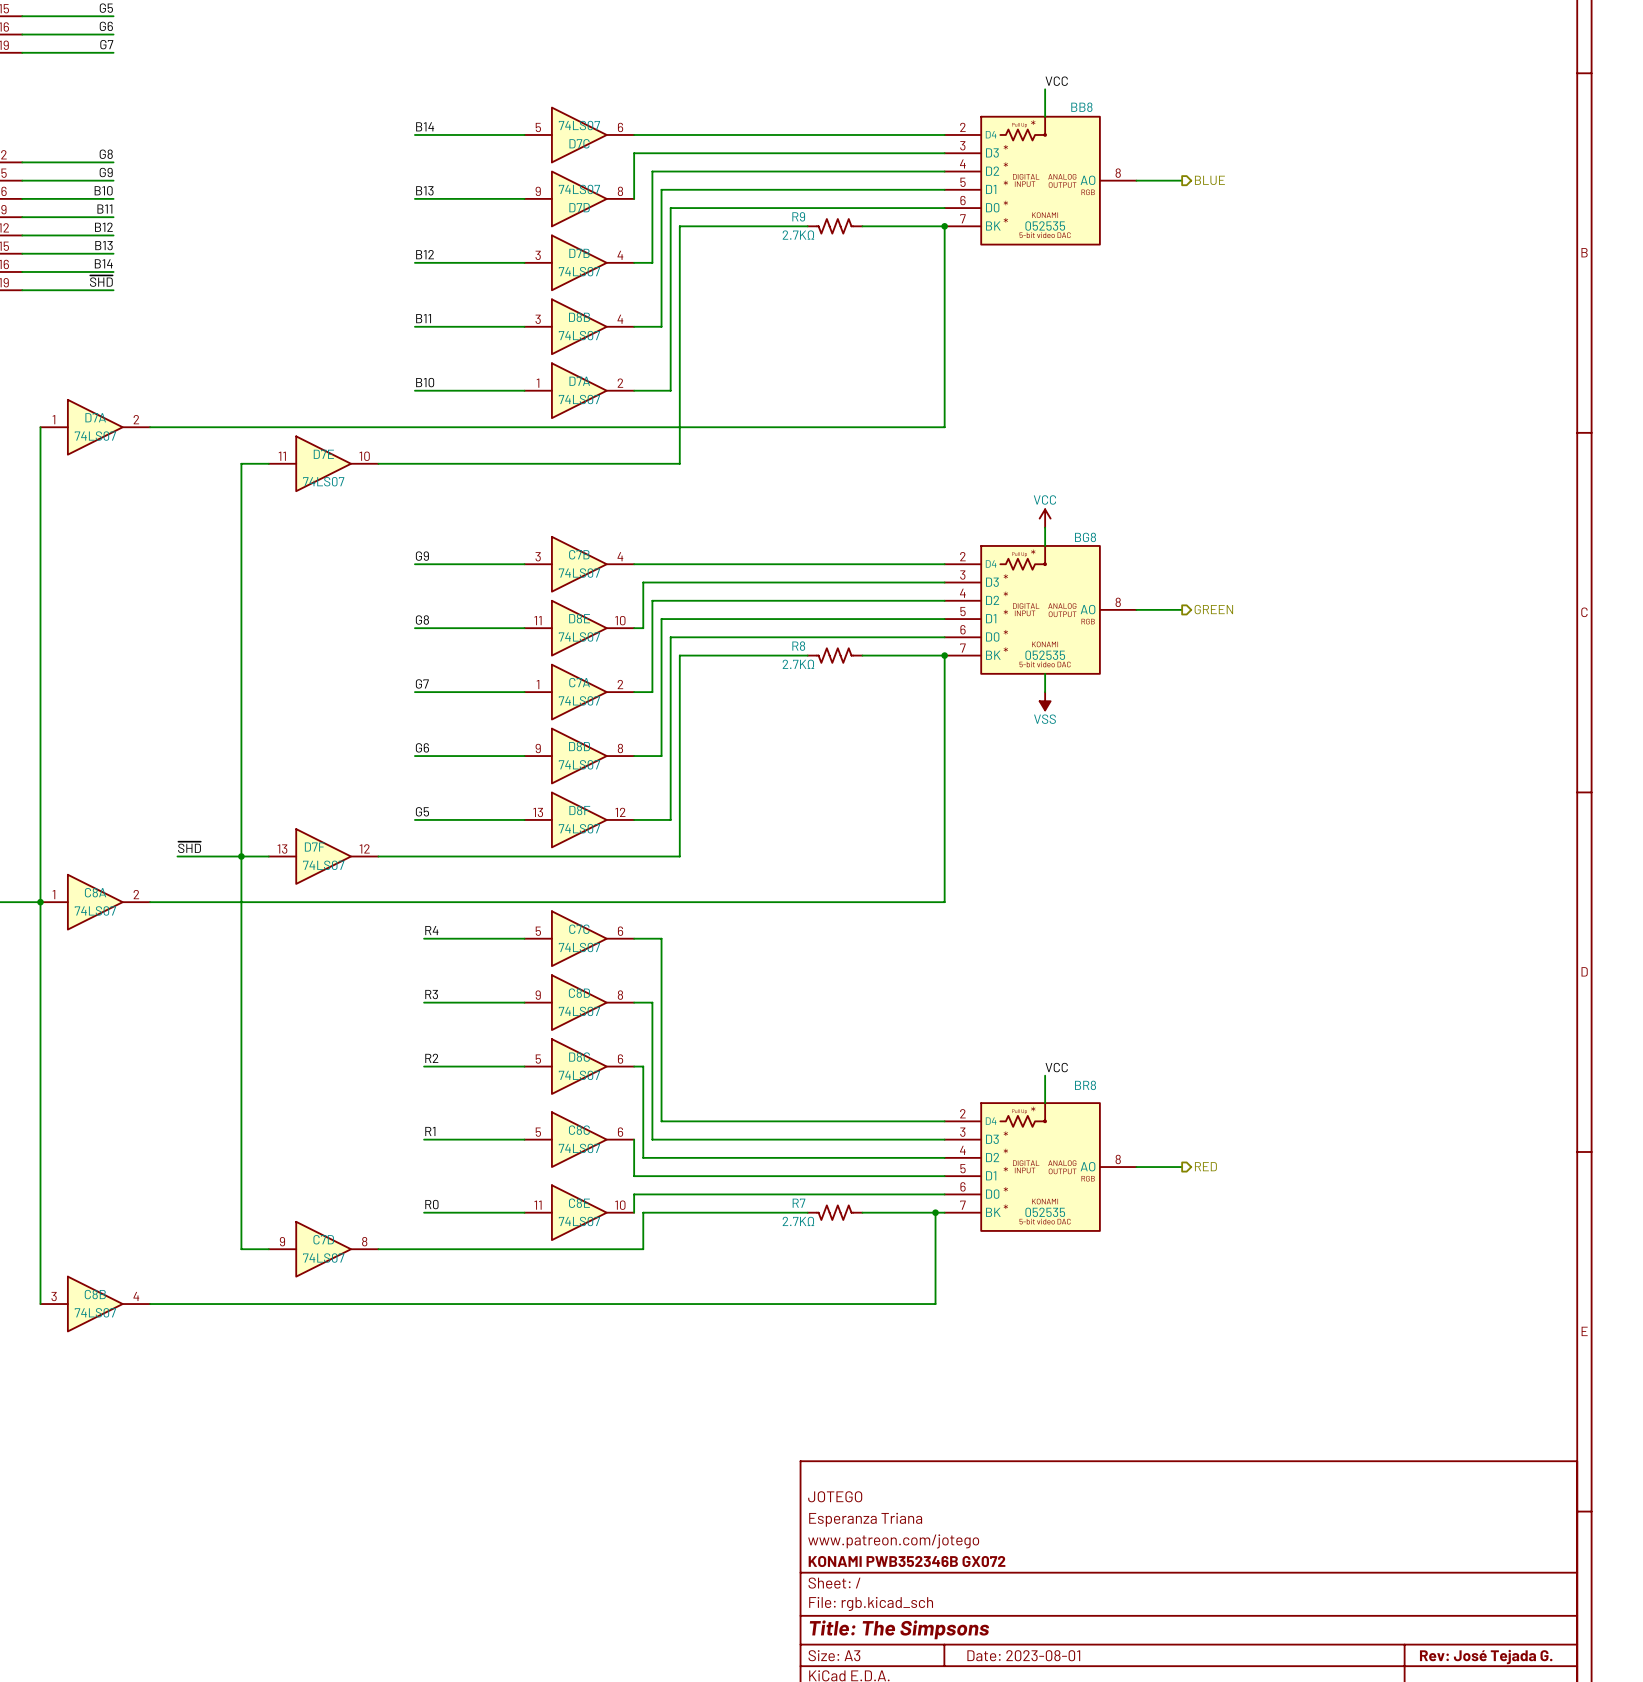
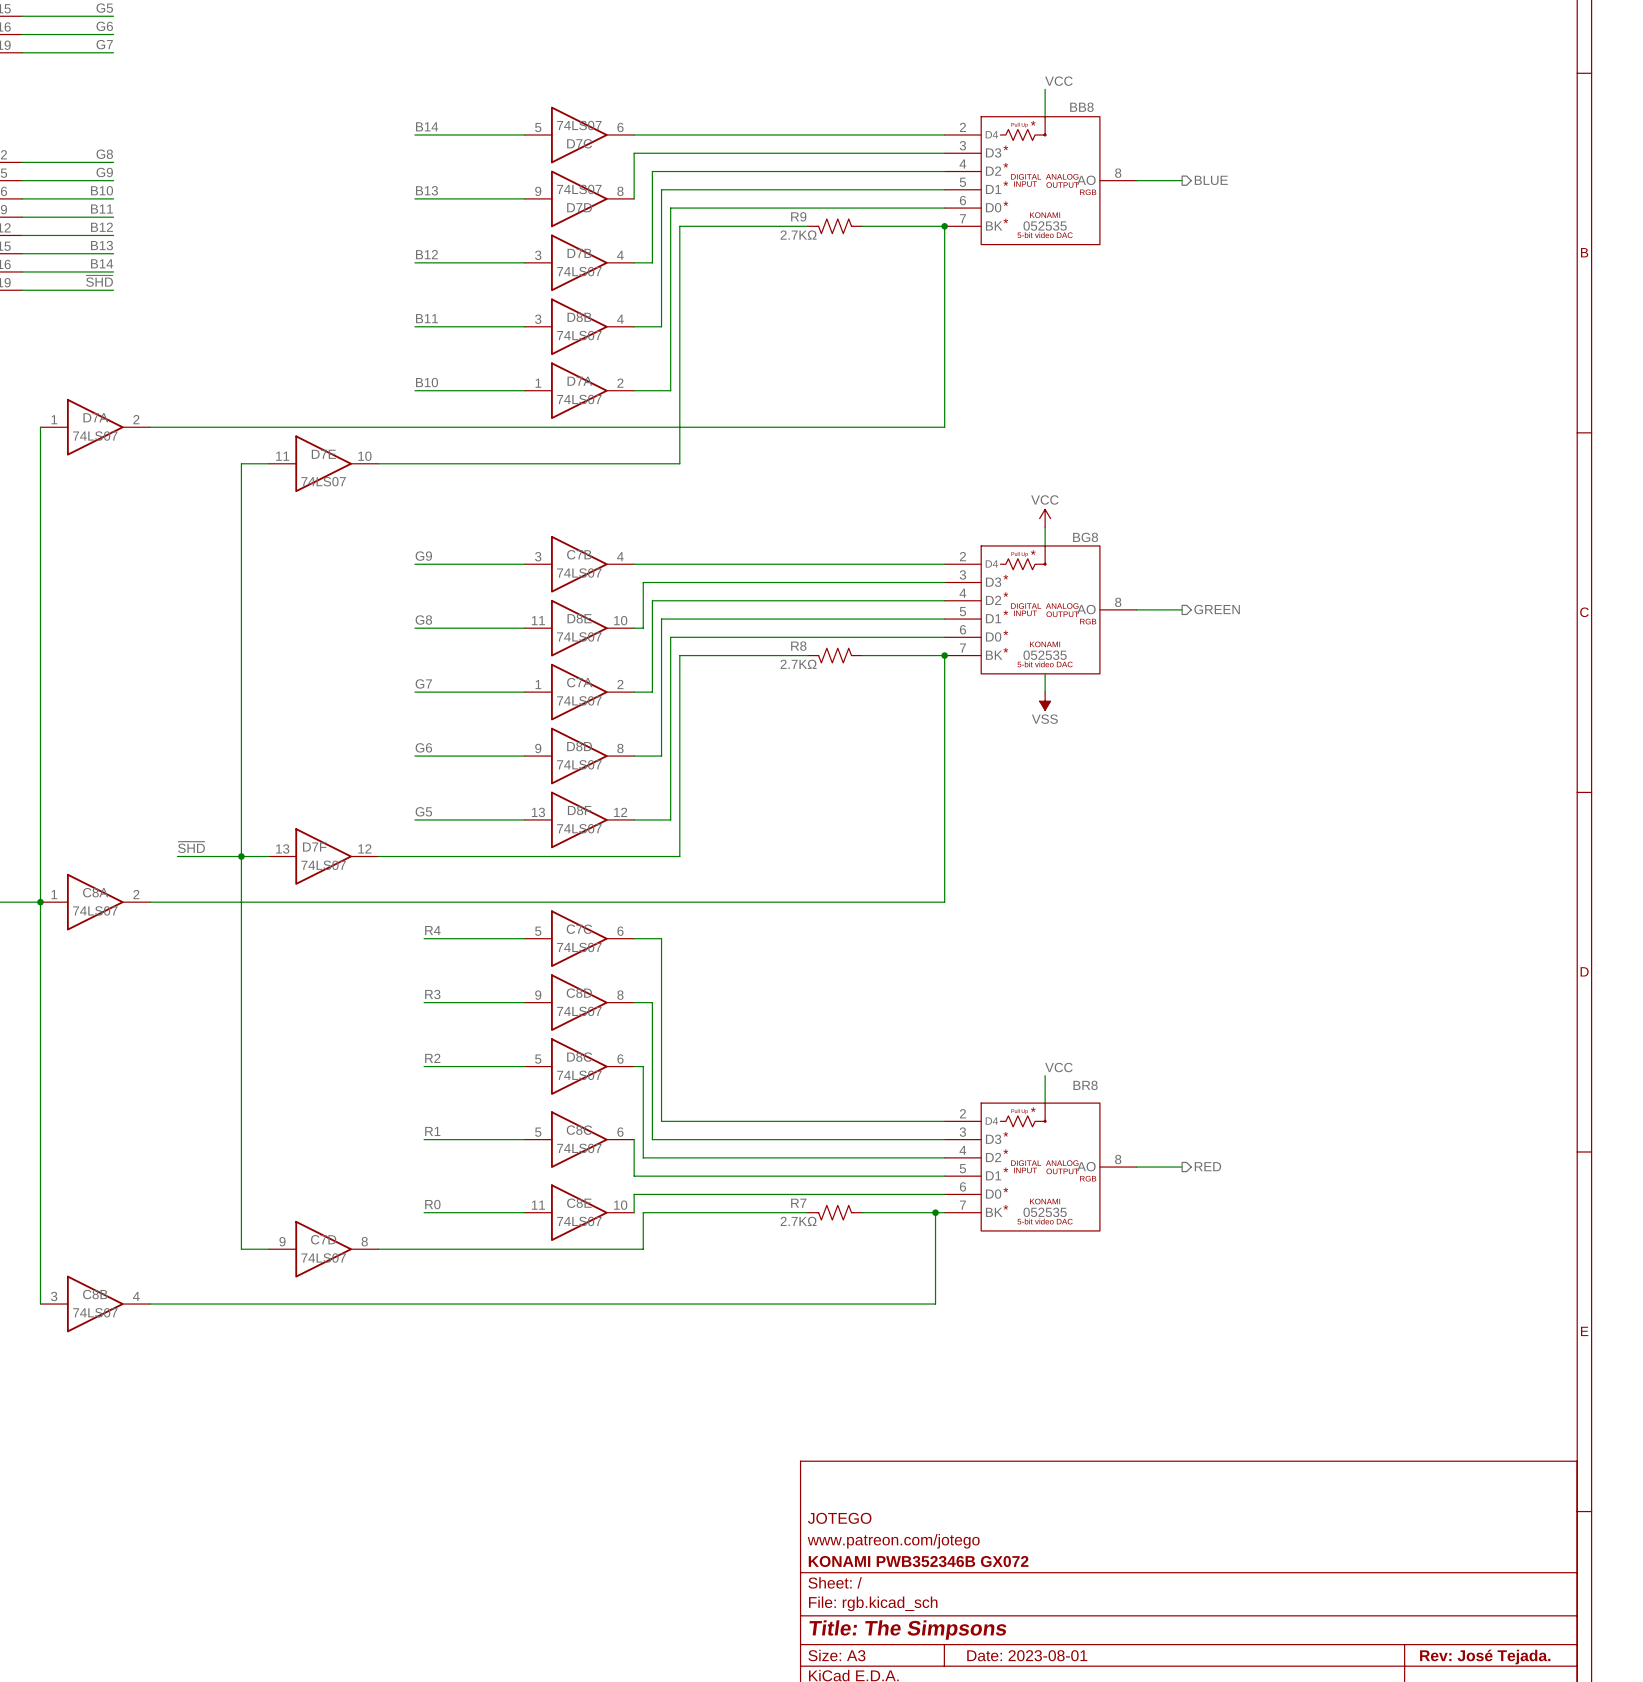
title block: JOTEGO (835, 1496) -> none
title block: Esperanza Triana (865, 1519) -> JOTEGO (839, 1518)
title block: Rev: José Tejada G. (1486, 1657) -> Rev: José Tejada. (1485, 1656)

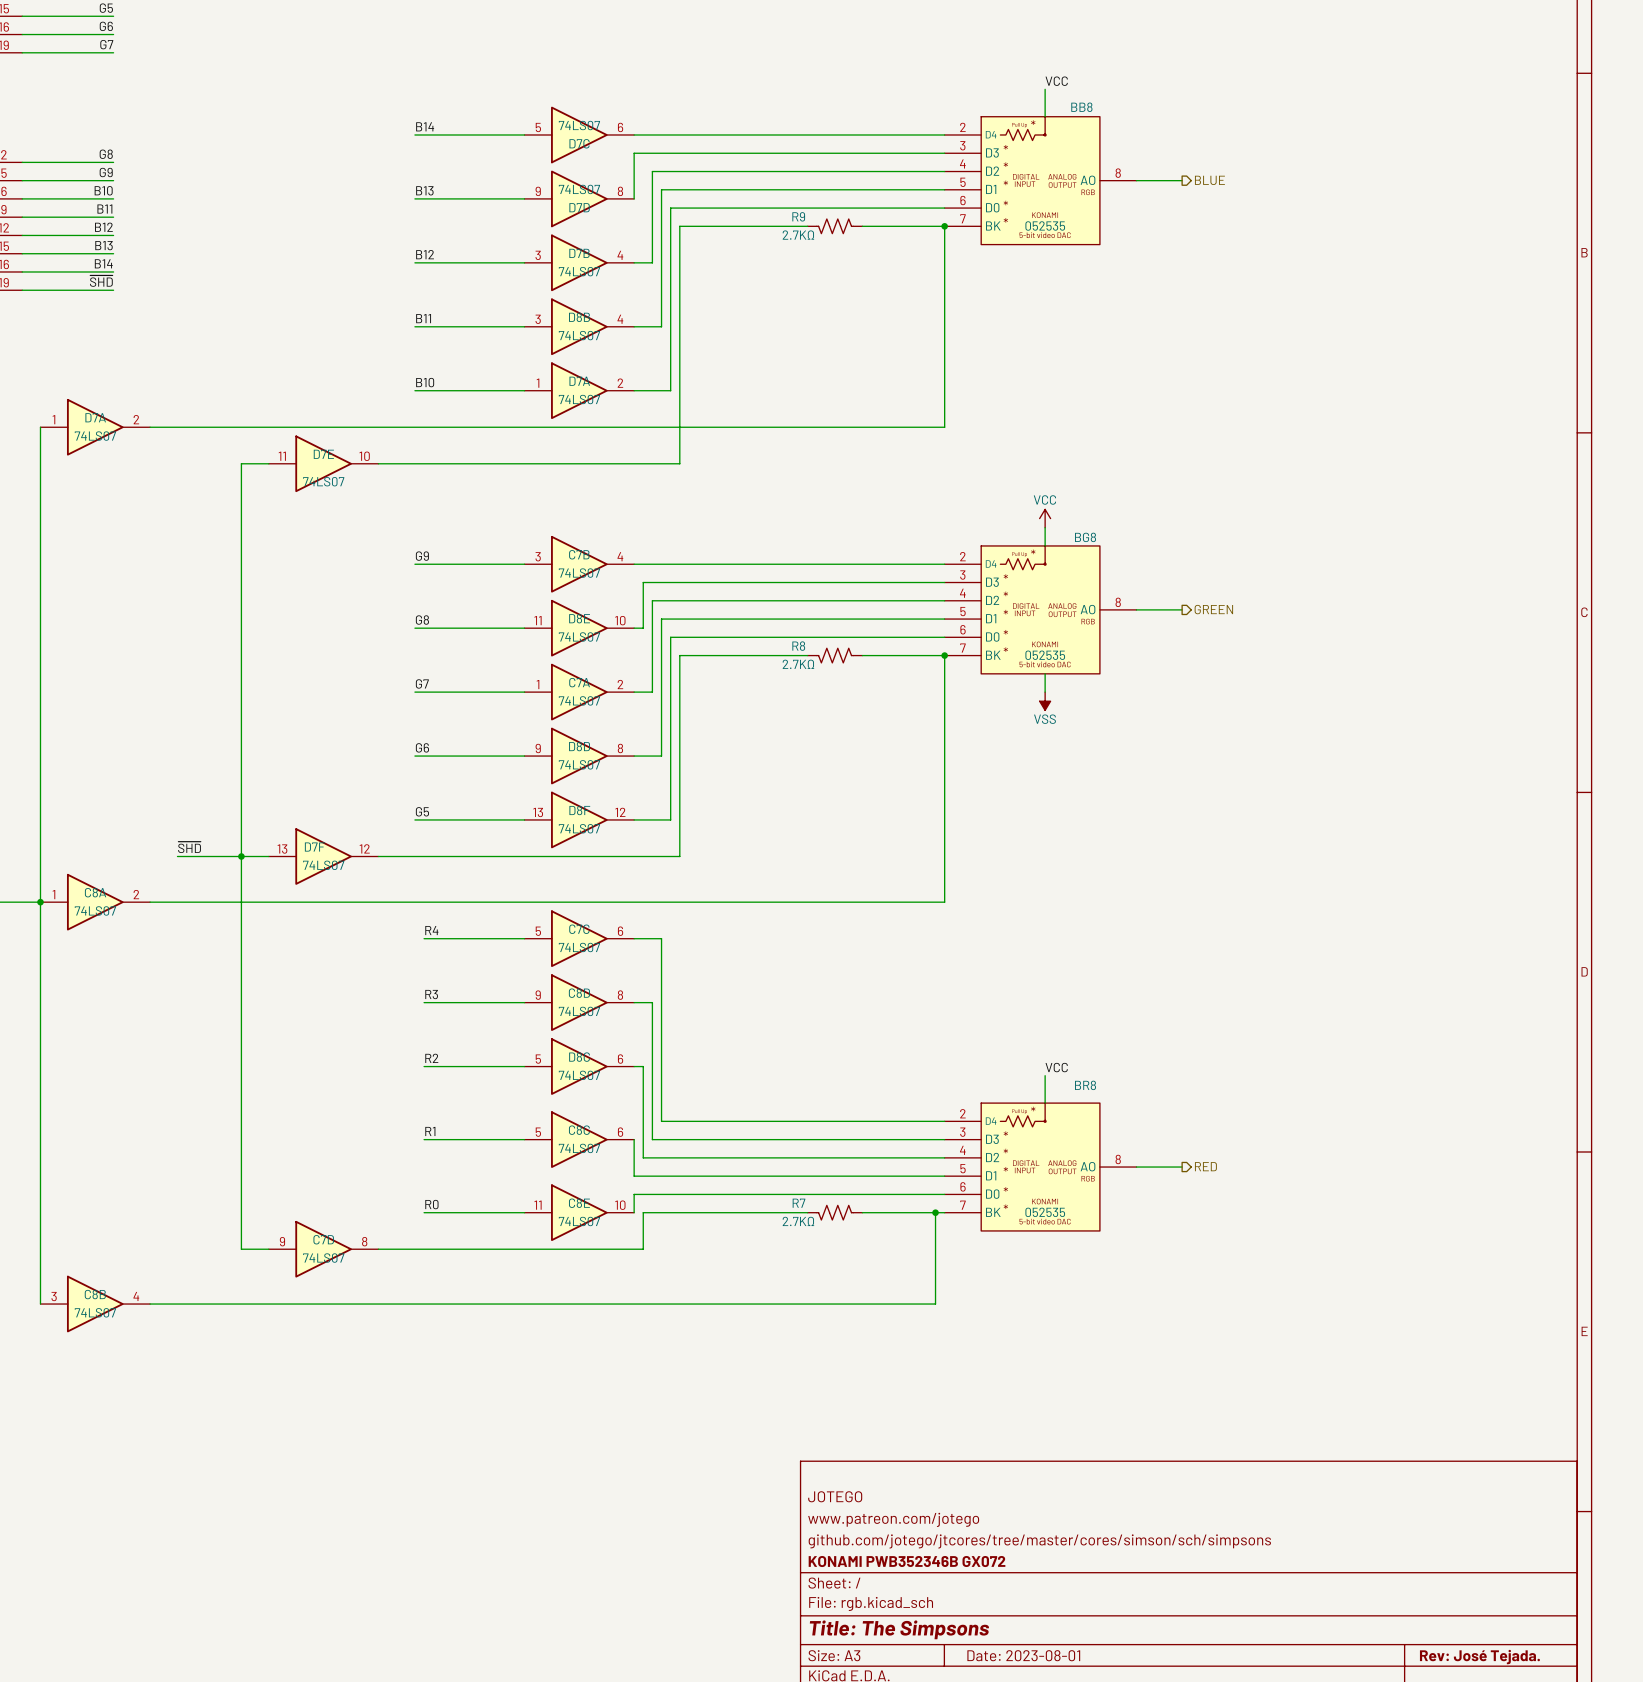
title block: none -> JOTEGO (835, 1496)
title block: JOTEGO (839, 1518) -> www.patreon.com/jotego (893, 1519)
title block: www.patreon.com/jotego (893, 1541) -> github.com/jotego/jtcores/tree/master/cores/simson/sch/simpsons (1039, 1541)

